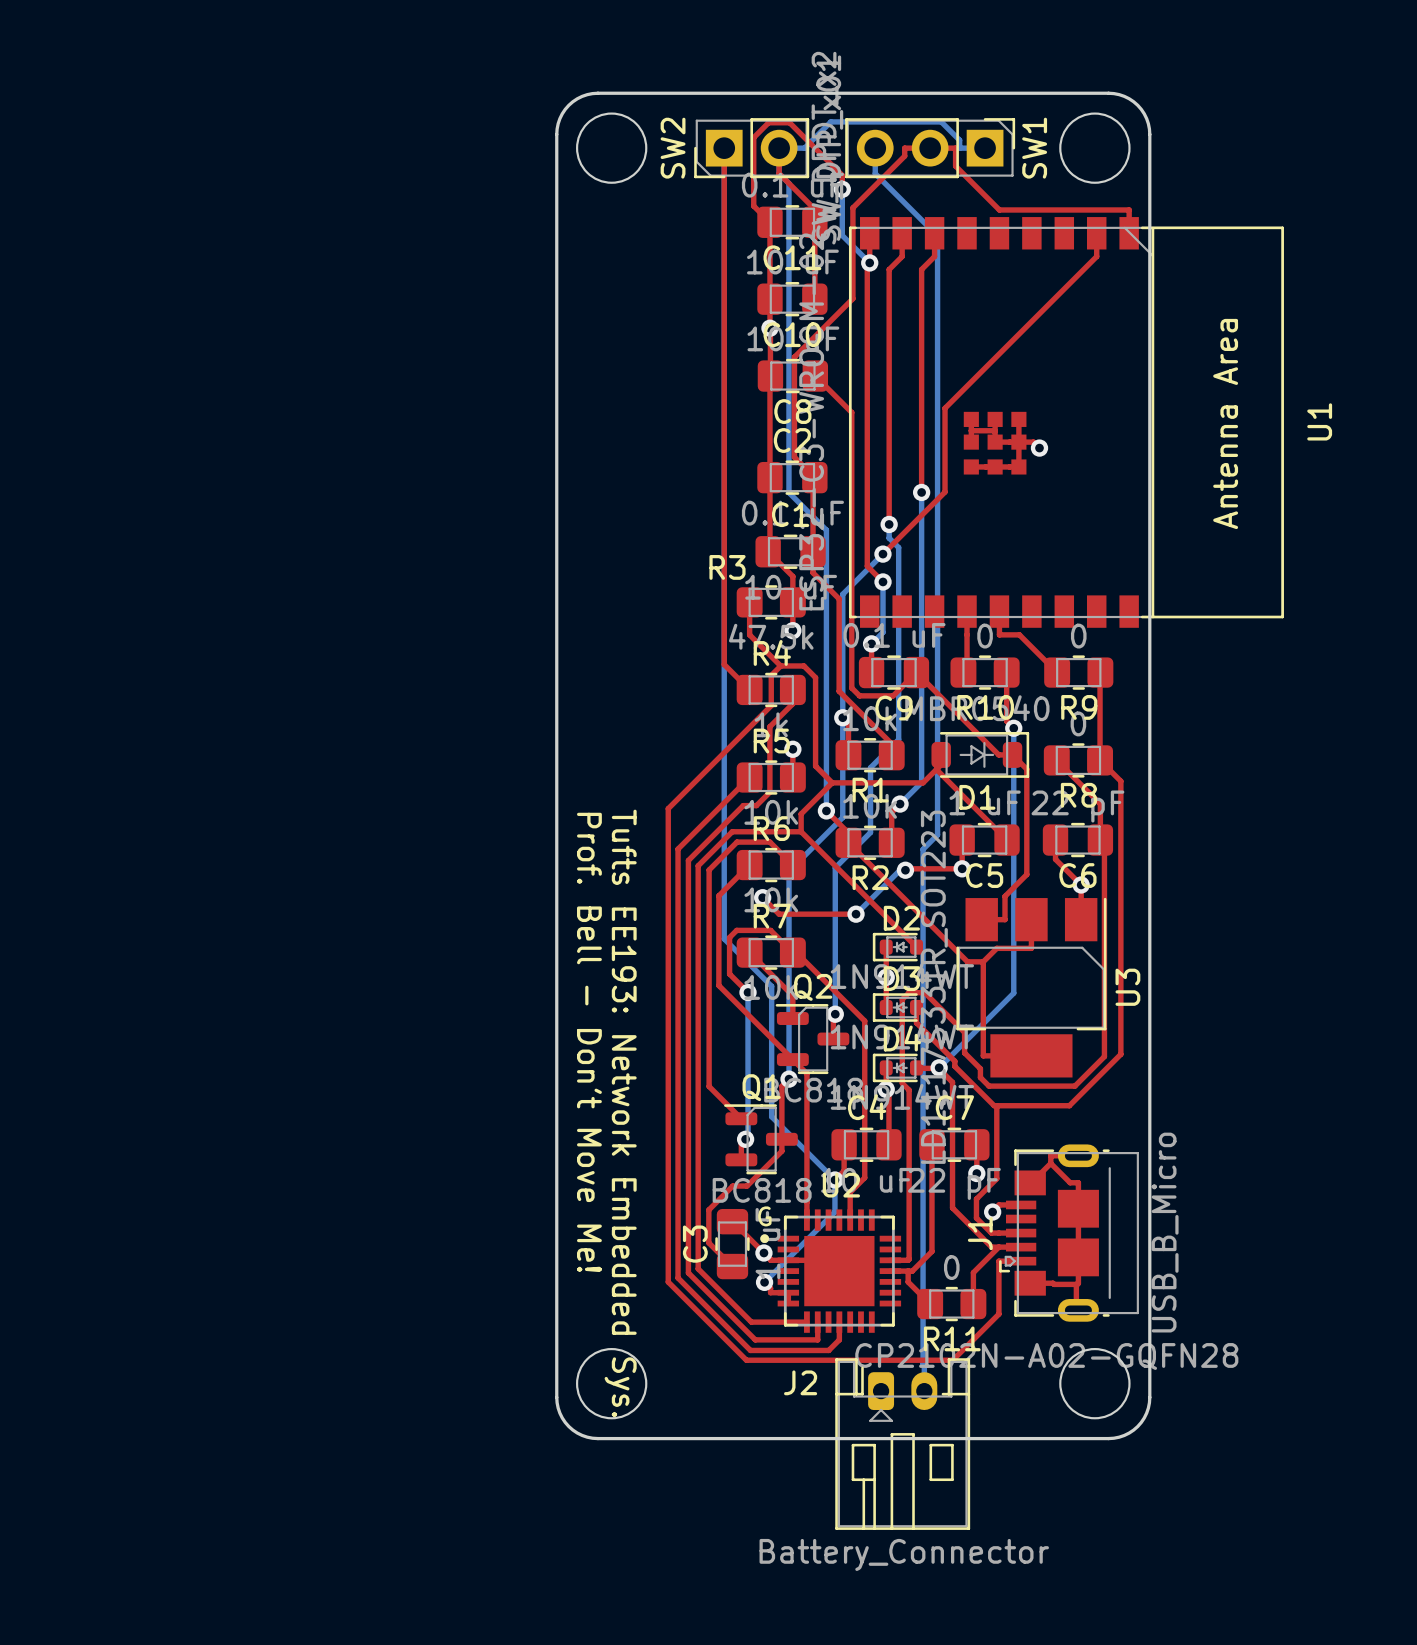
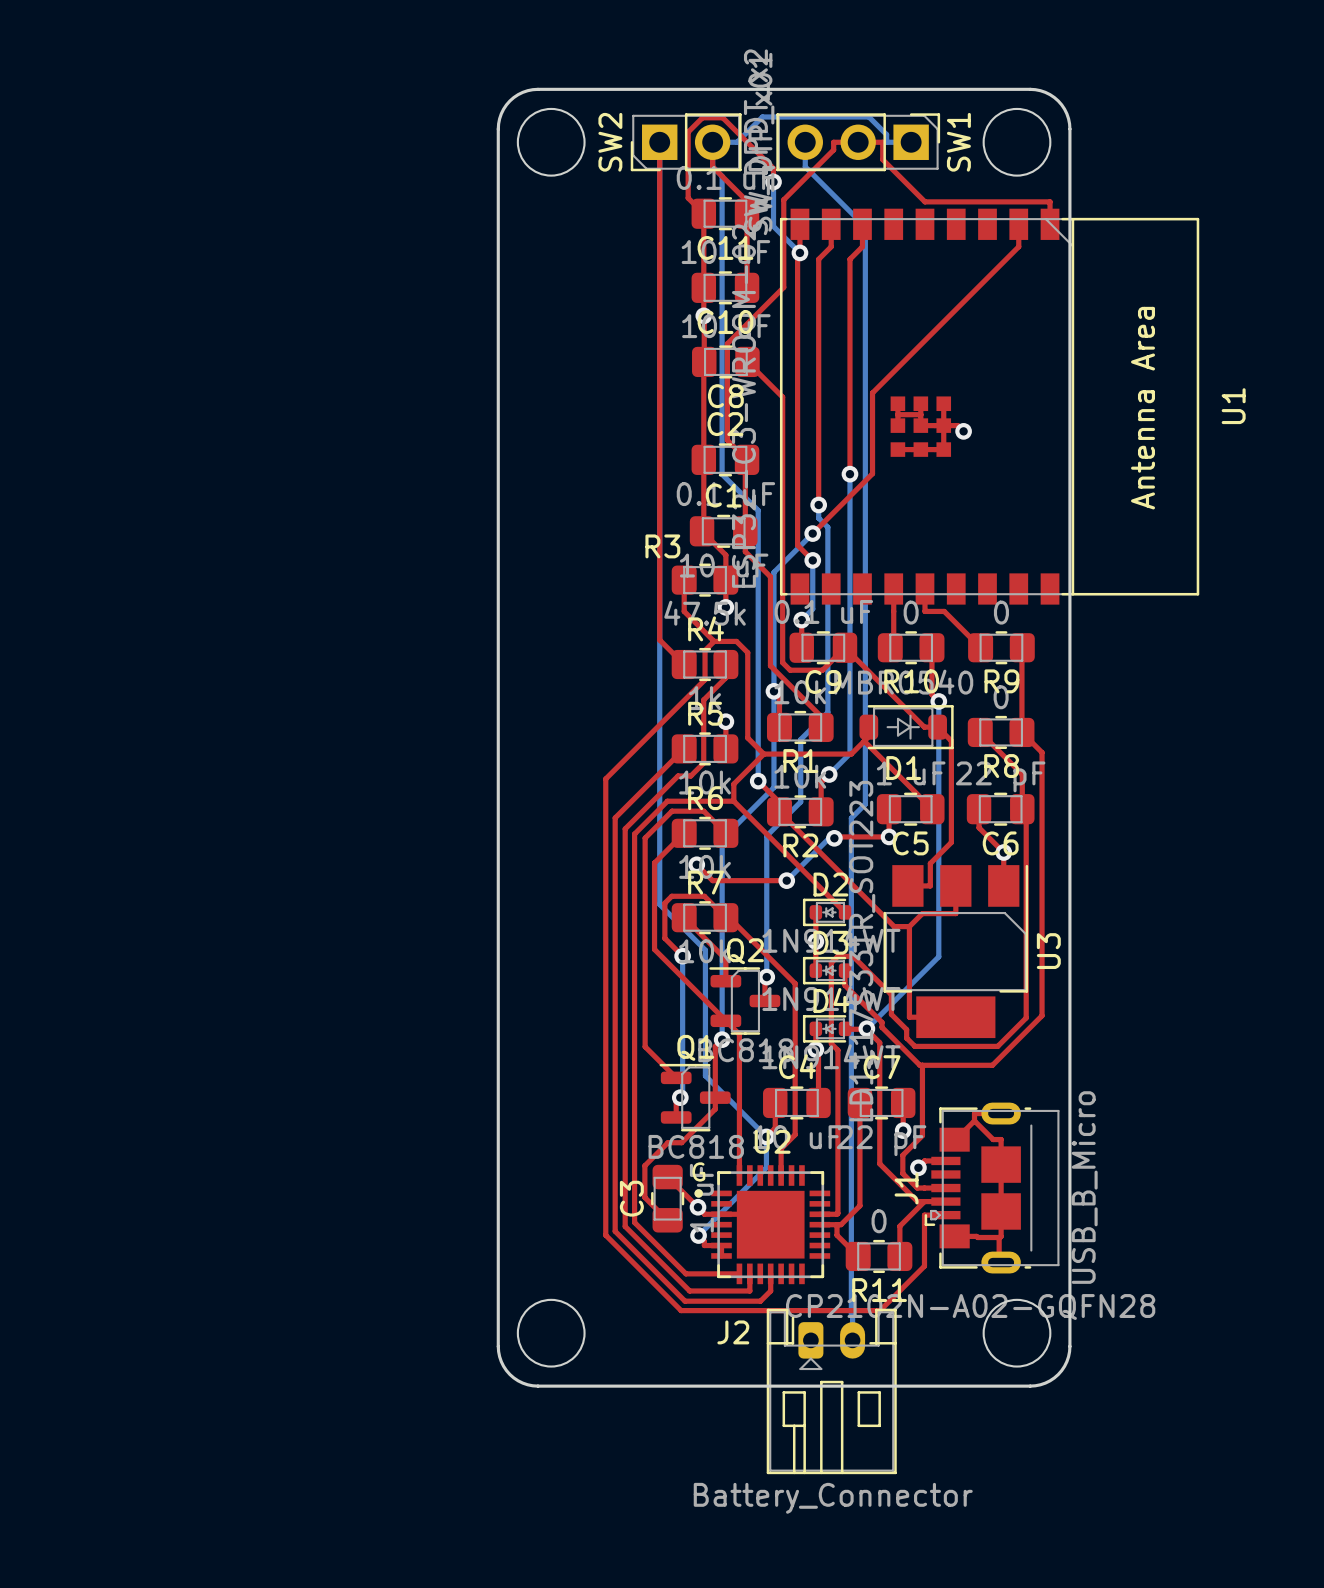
text: Prof. Bell - Don't Move Me! (589, 1042) -> none
text: Tufts EE193: Network Embedded Sys. (620, 1113) -> none

